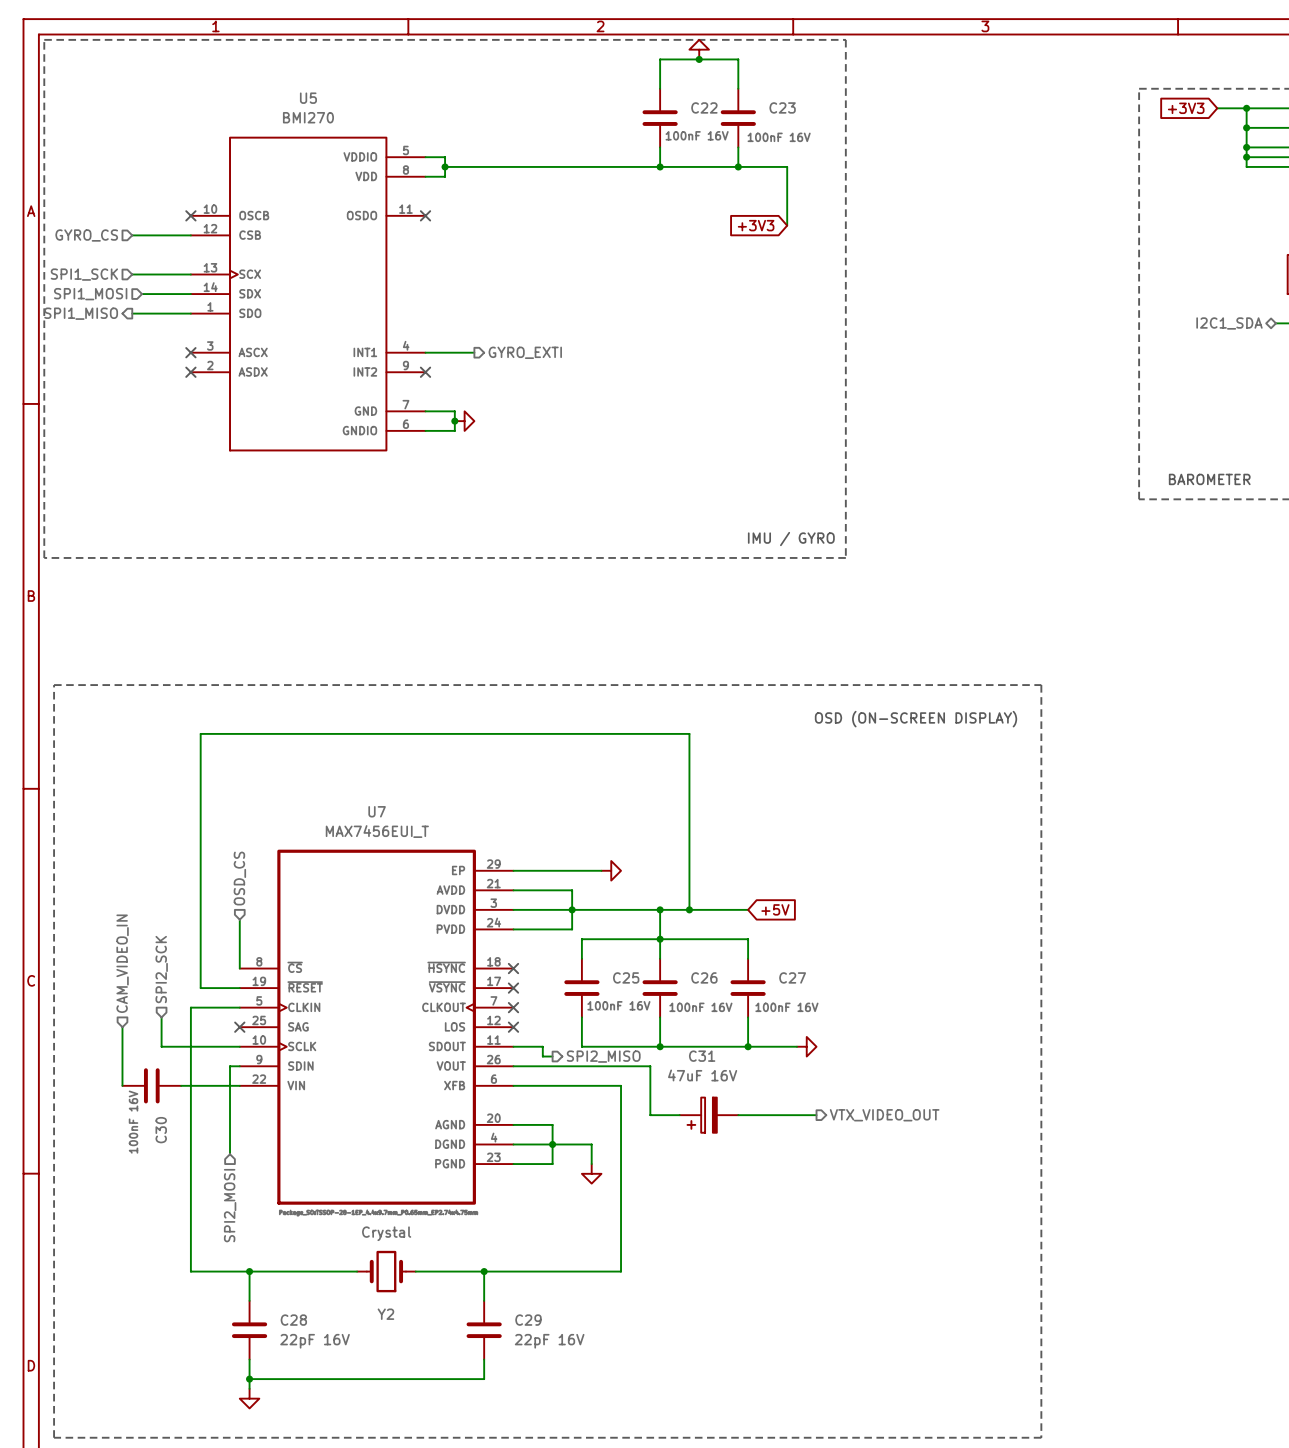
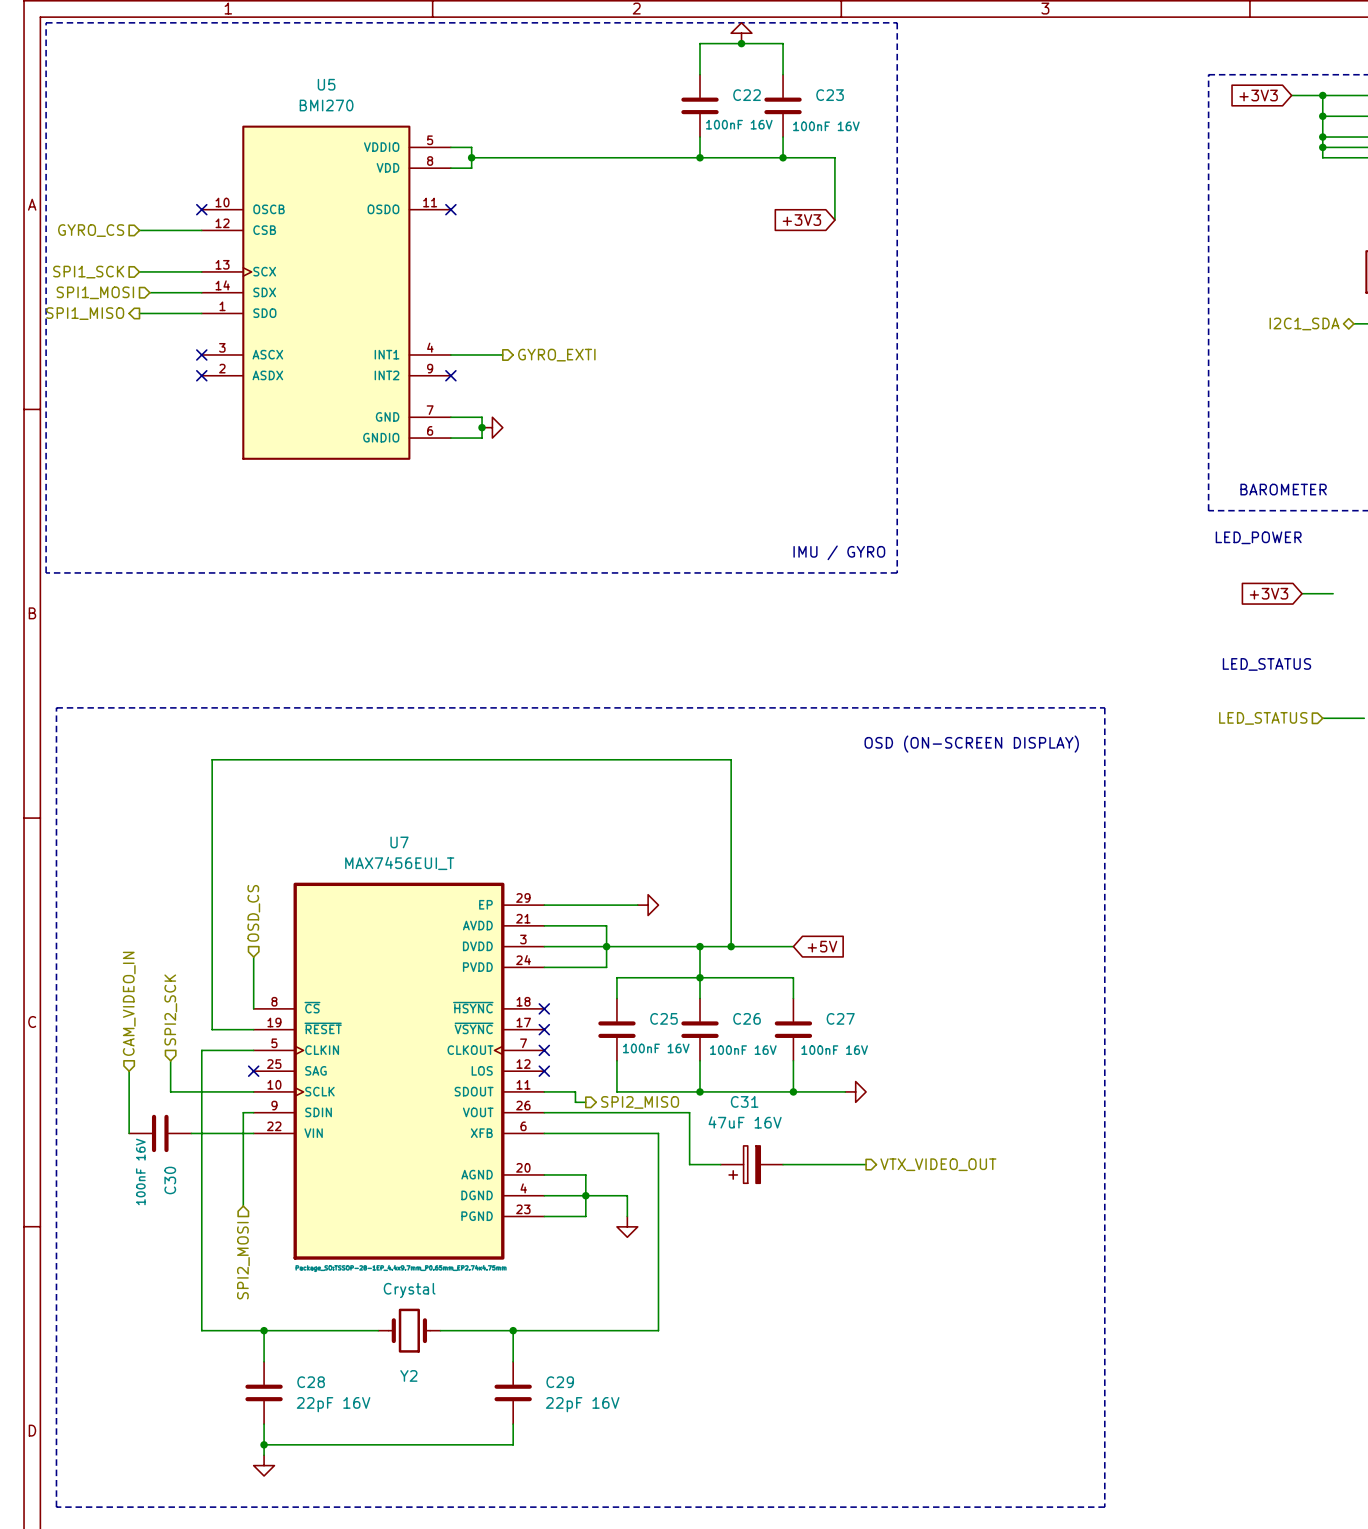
text: none -> LED_POWER (1258, 537)
global label: none -> +3V3 (1269, 593)
wire: none -> (1302, 593) (1333, 593)
text: none -> LED_STATUS (1266, 664)
hierarchical label: none -> LED_STATUS (1263, 718)
wire: none -> (1322, 718) (1364, 718)

